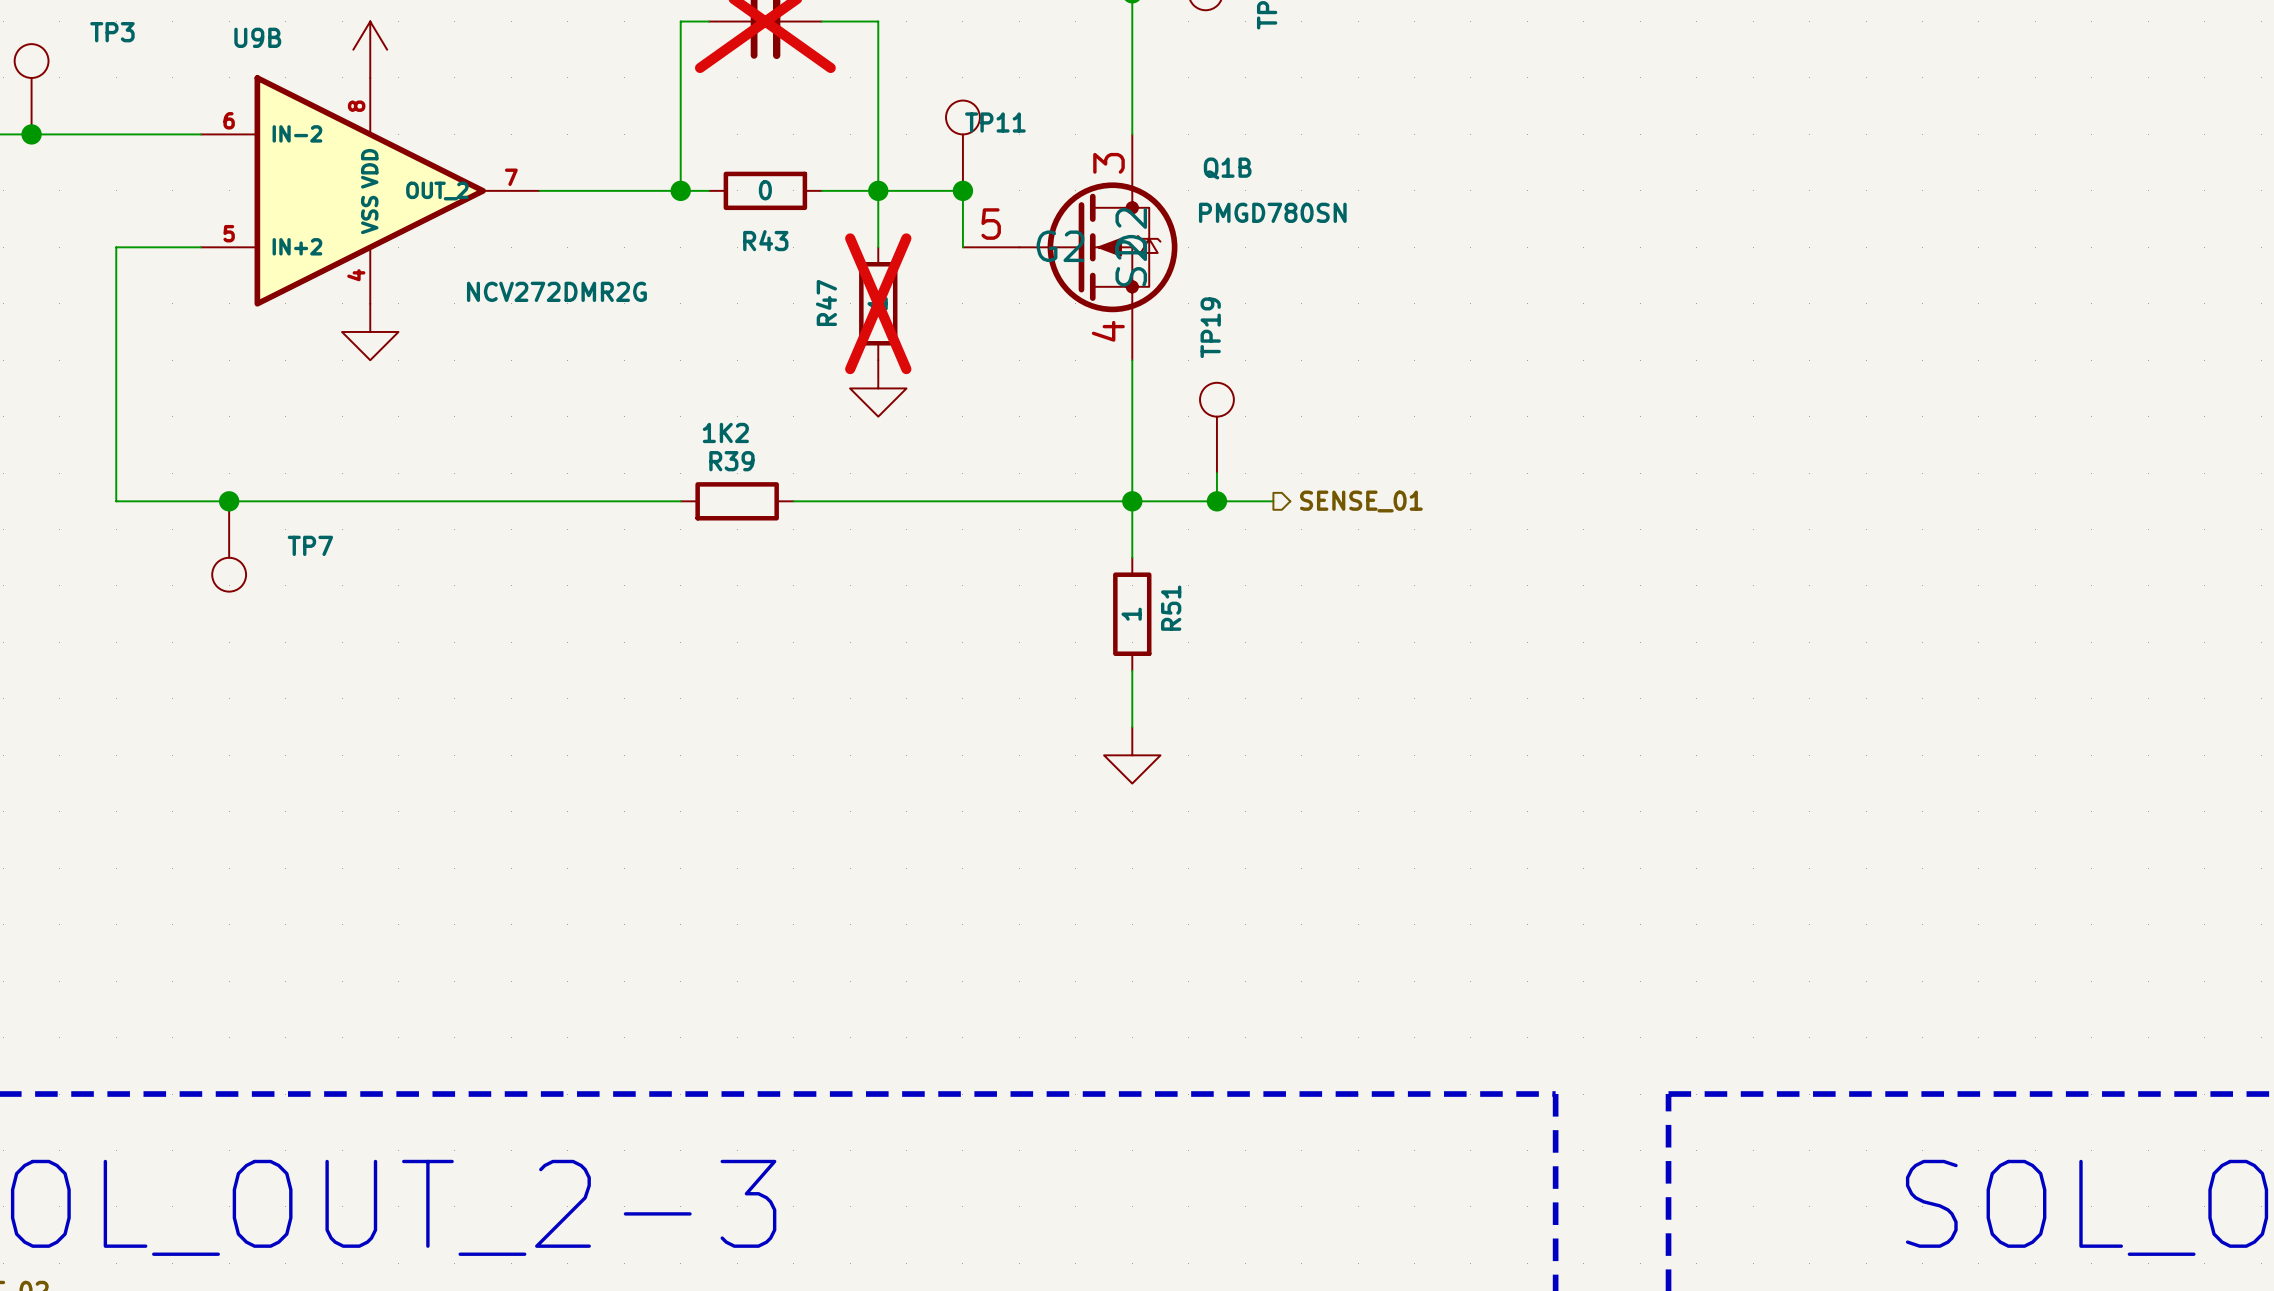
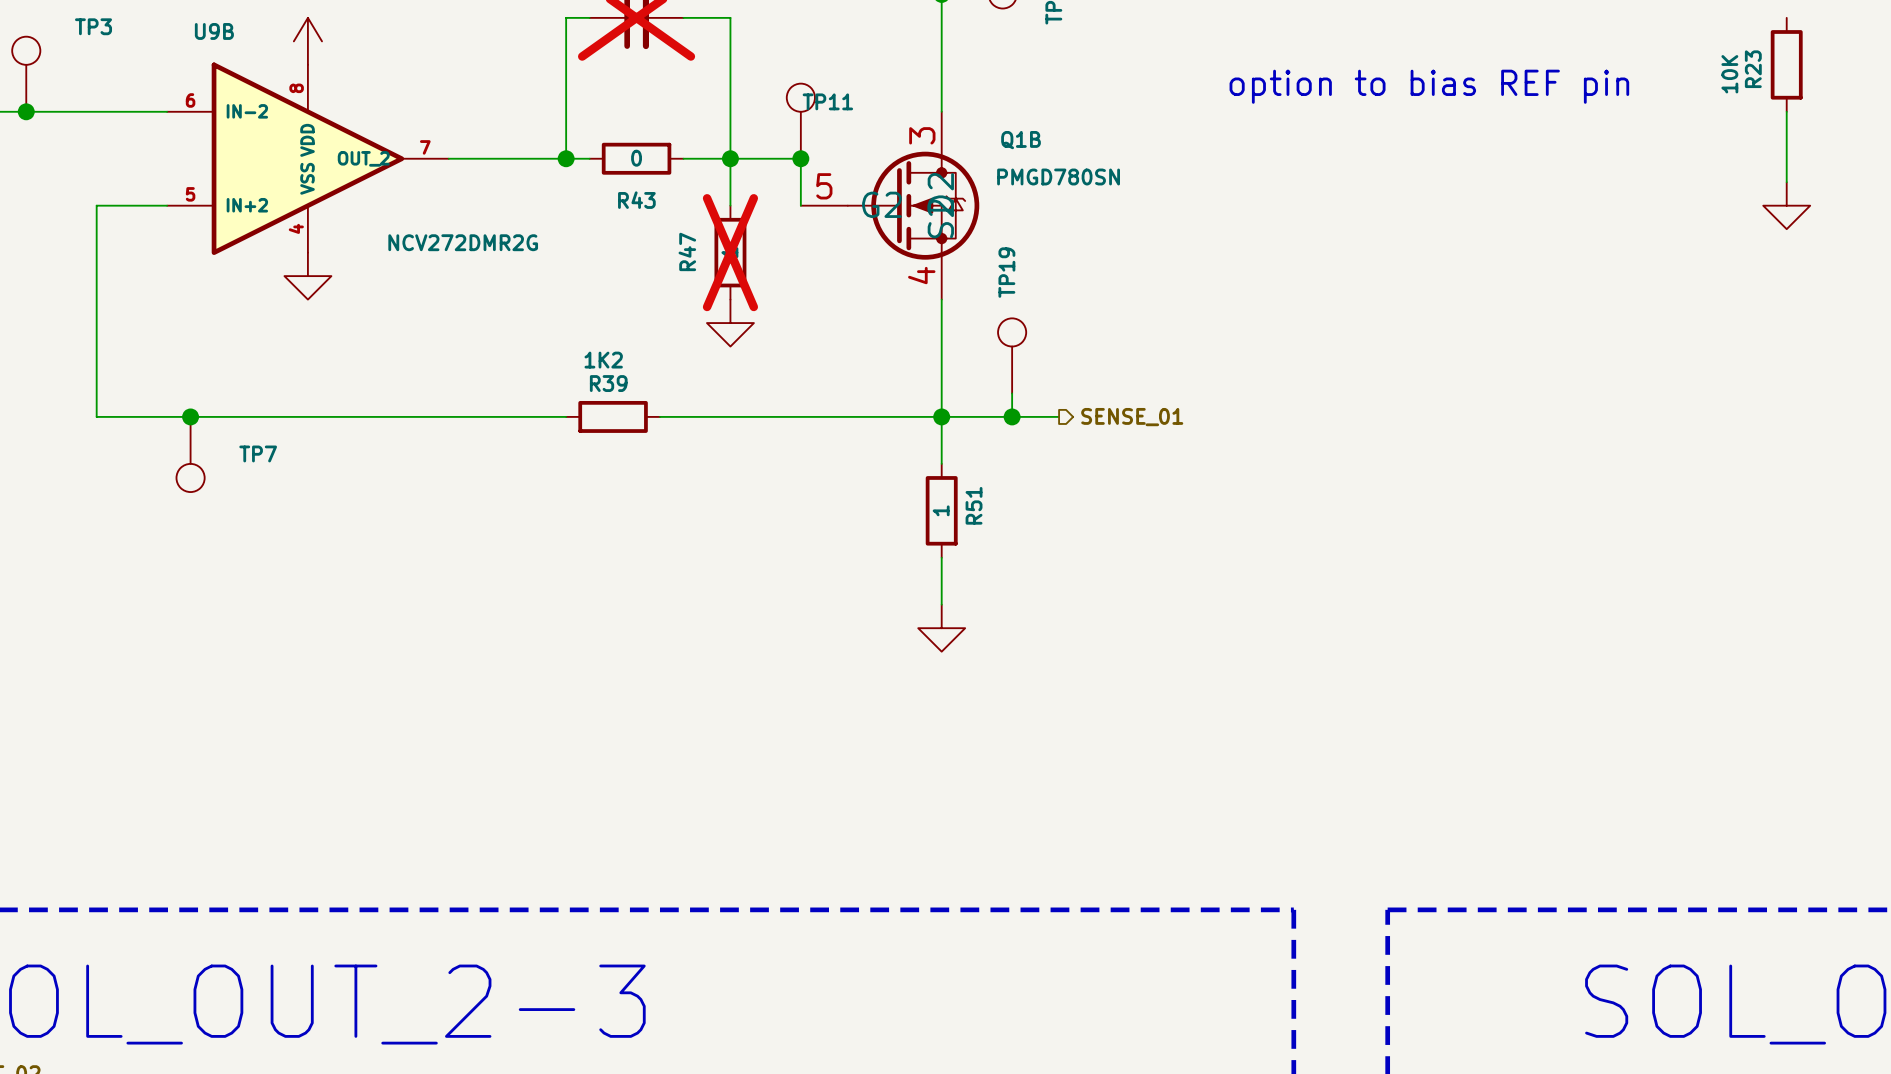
R23: none -> 10K (1786, 64)
text: none -> option to bias REF pin (1429, 86)
wire: none -> (1786, 111) (1786, 182)
power symbol: none -> (1786, 205)

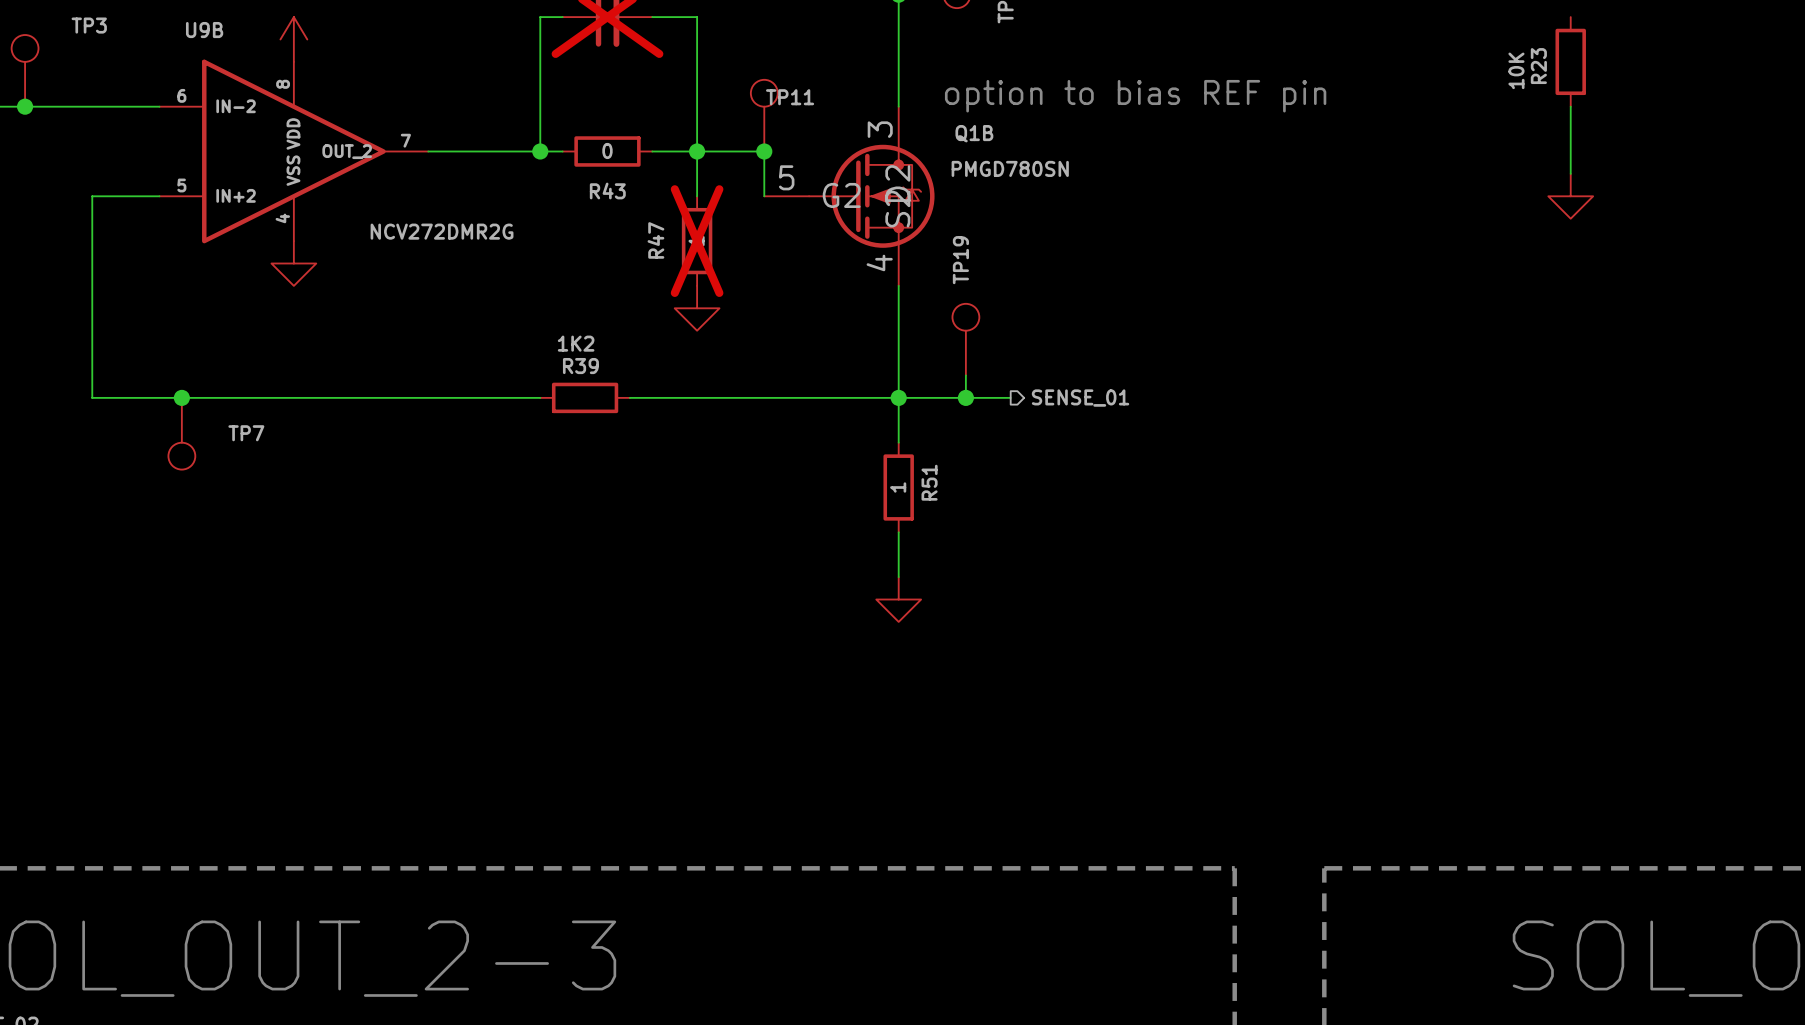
R23 position: (1786, 64) -> (1570, 61)
text position: option to bias REF pin (1429, 86) -> option to bias REF pin (1135, 96)
wire: (1786, 111) (1786, 182) -> (1570, 106) (1570, 173)
power symbol position: (1786, 205) -> (1570, 196)

